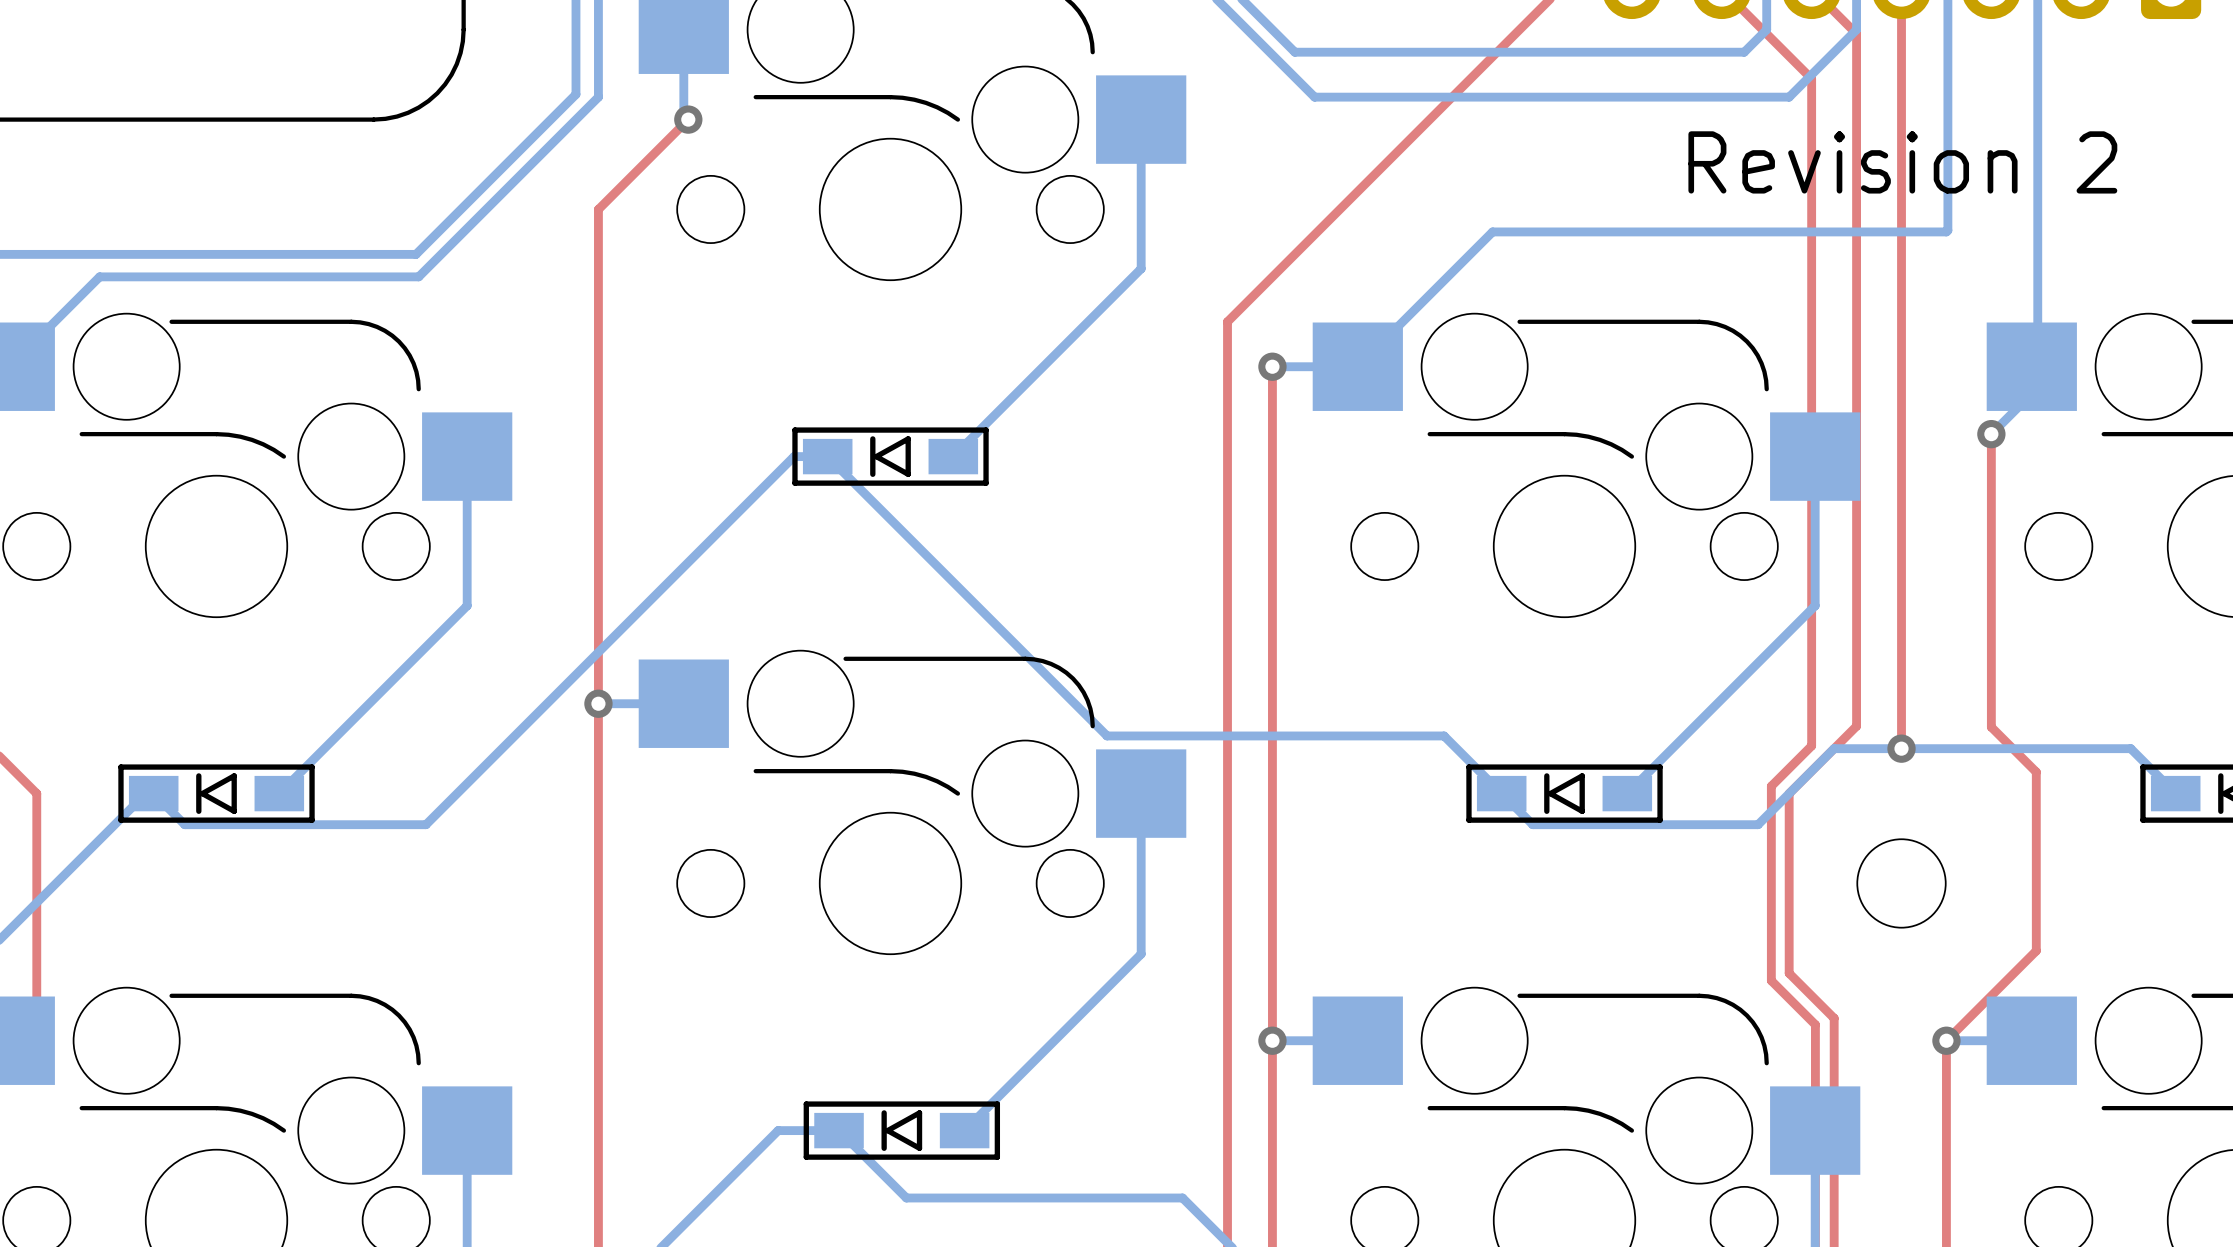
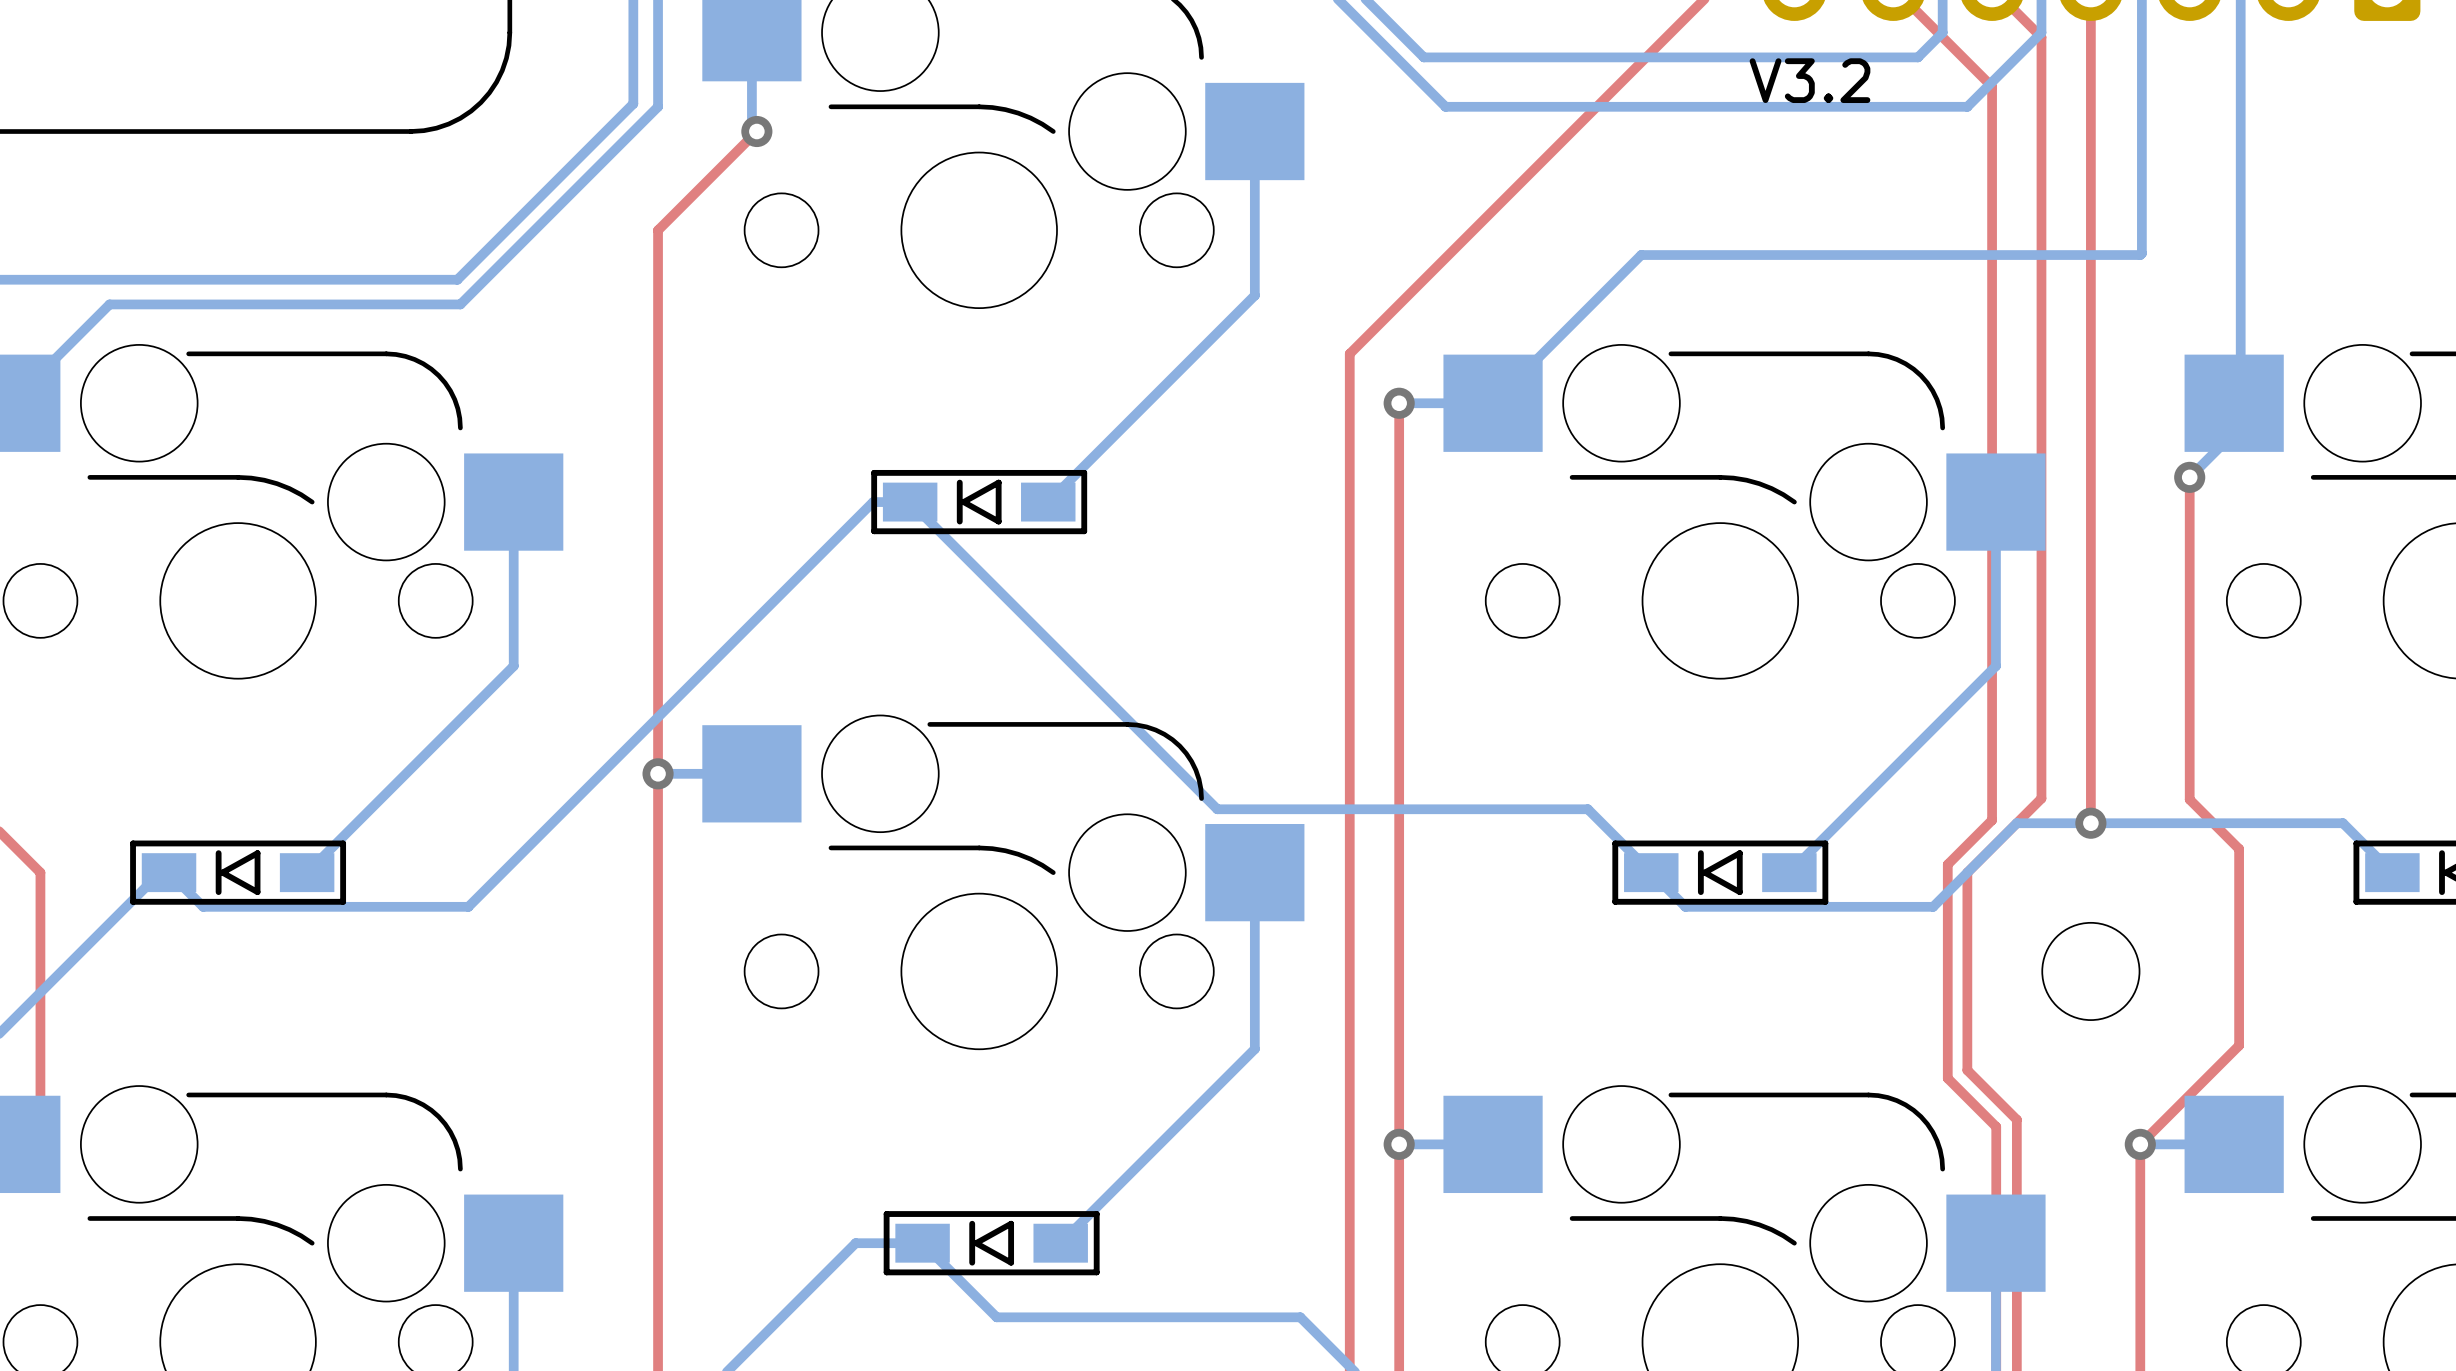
text: none -> V3.2 (1810, 80)
text: Revision 2 (1902, 162) -> none

